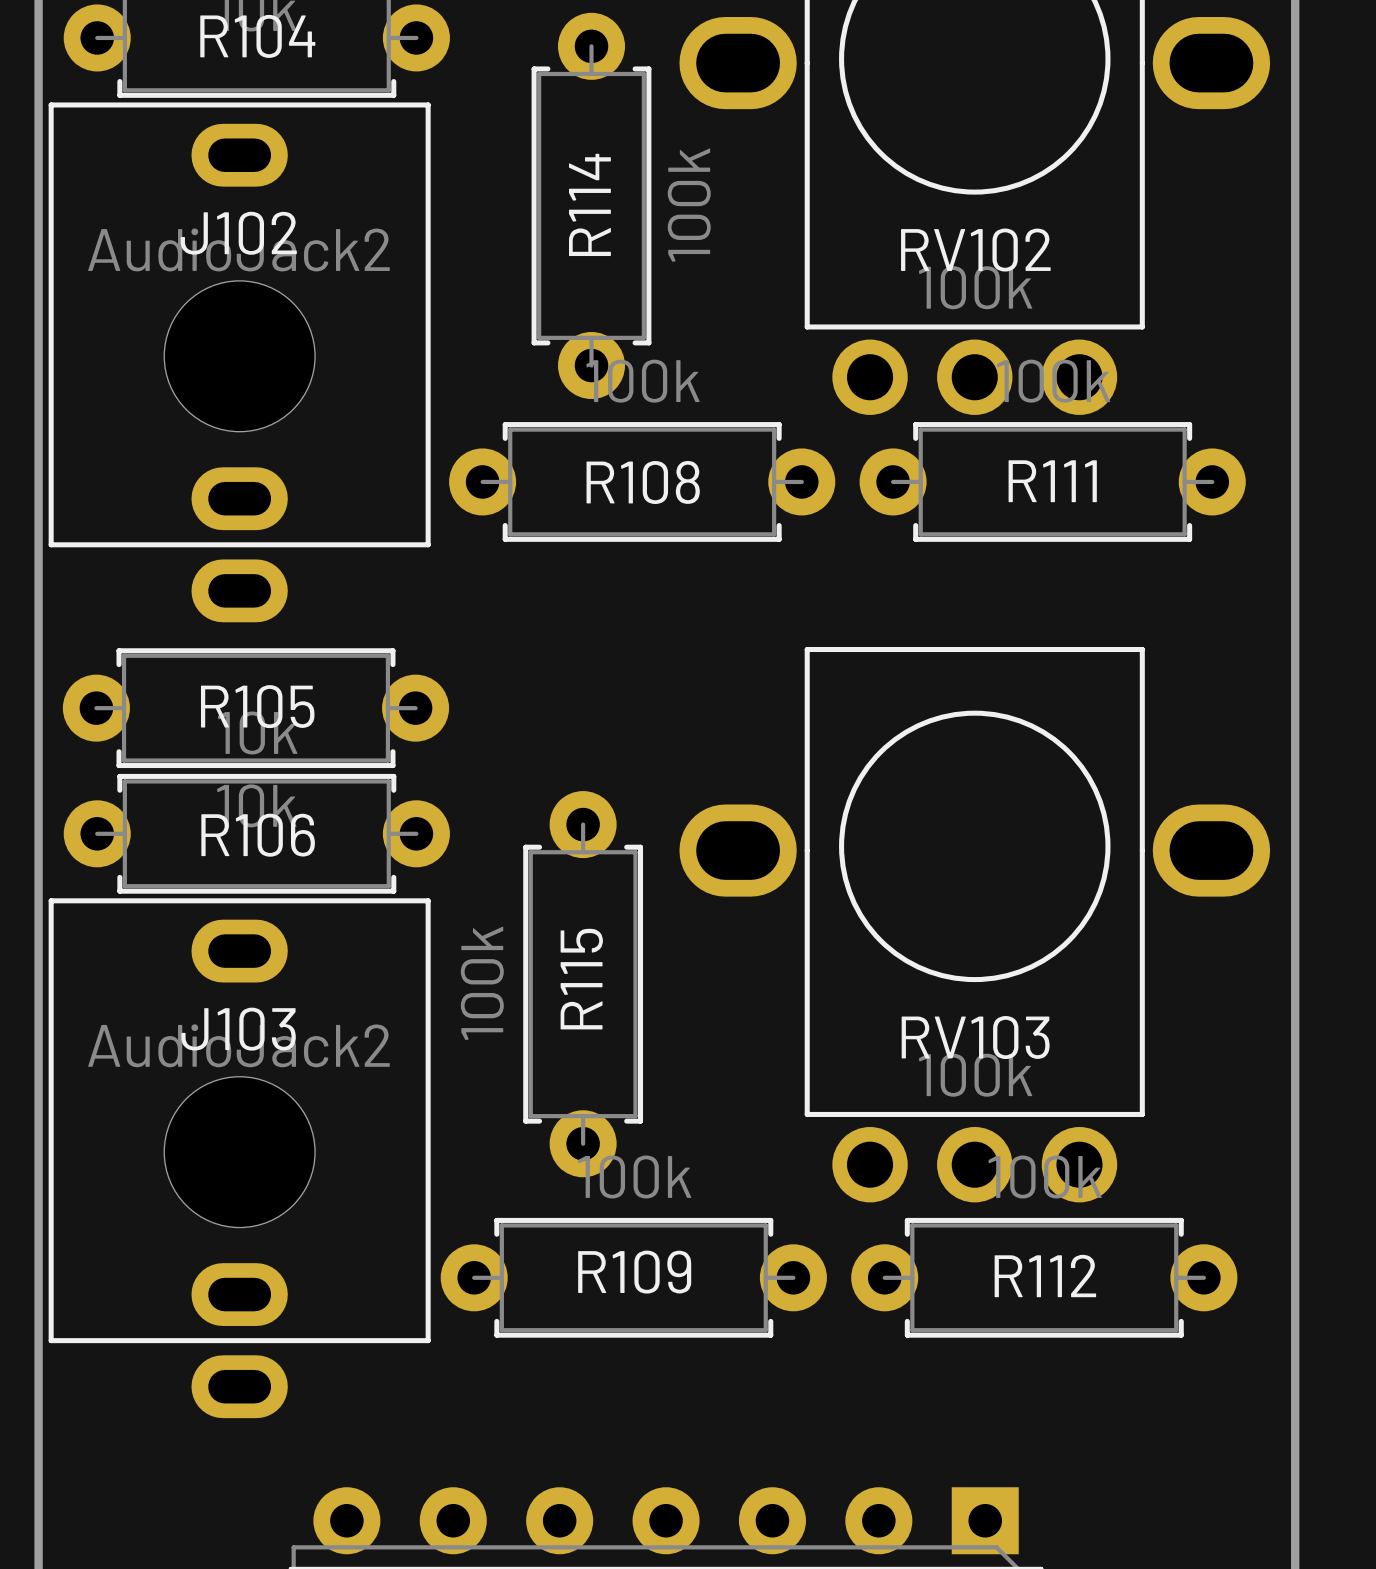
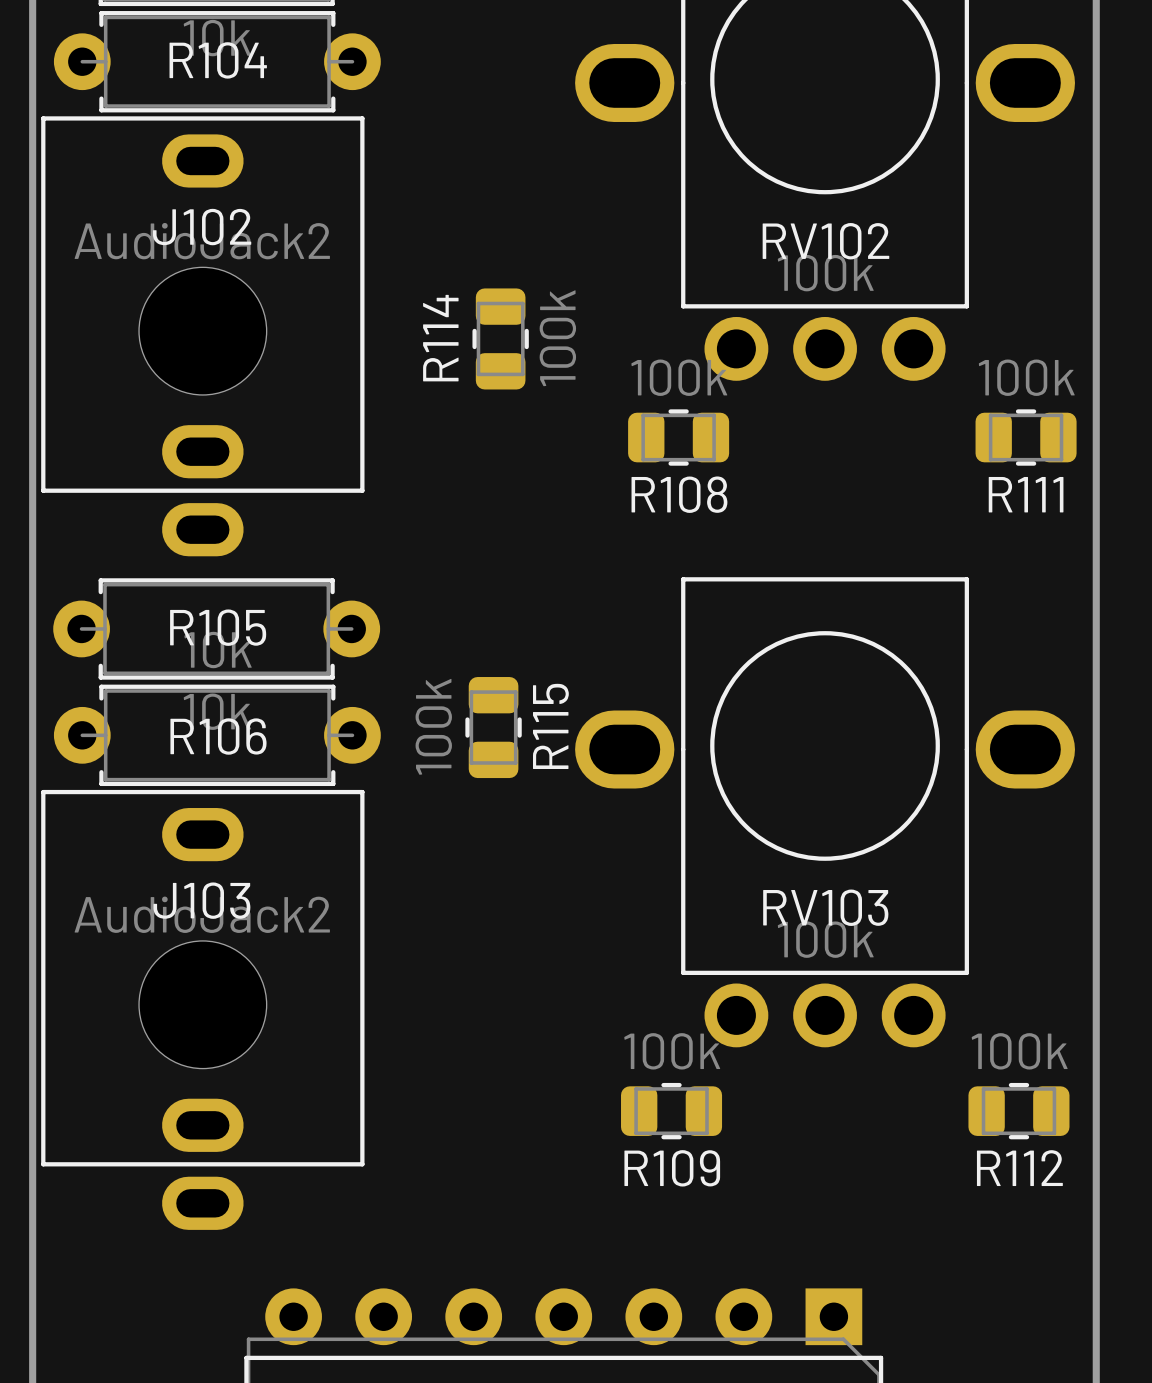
R114 footprint: [531, 12, 652, 400] -> [472, 288, 529, 390]
R108 footprint: [449, 422, 836, 542] -> [628, 409, 730, 466]
R111 footprint: [859, 422, 1246, 542] -> [975, 409, 1077, 466]
R115 footprint: [523, 791, 644, 1178] -> [465, 677, 522, 779]
R109 footprint: [440, 1217, 827, 1338] -> [621, 1082, 723, 1140]
R112 footprint: [851, 1217, 1238, 1338] -> [968, 1082, 1070, 1140]

